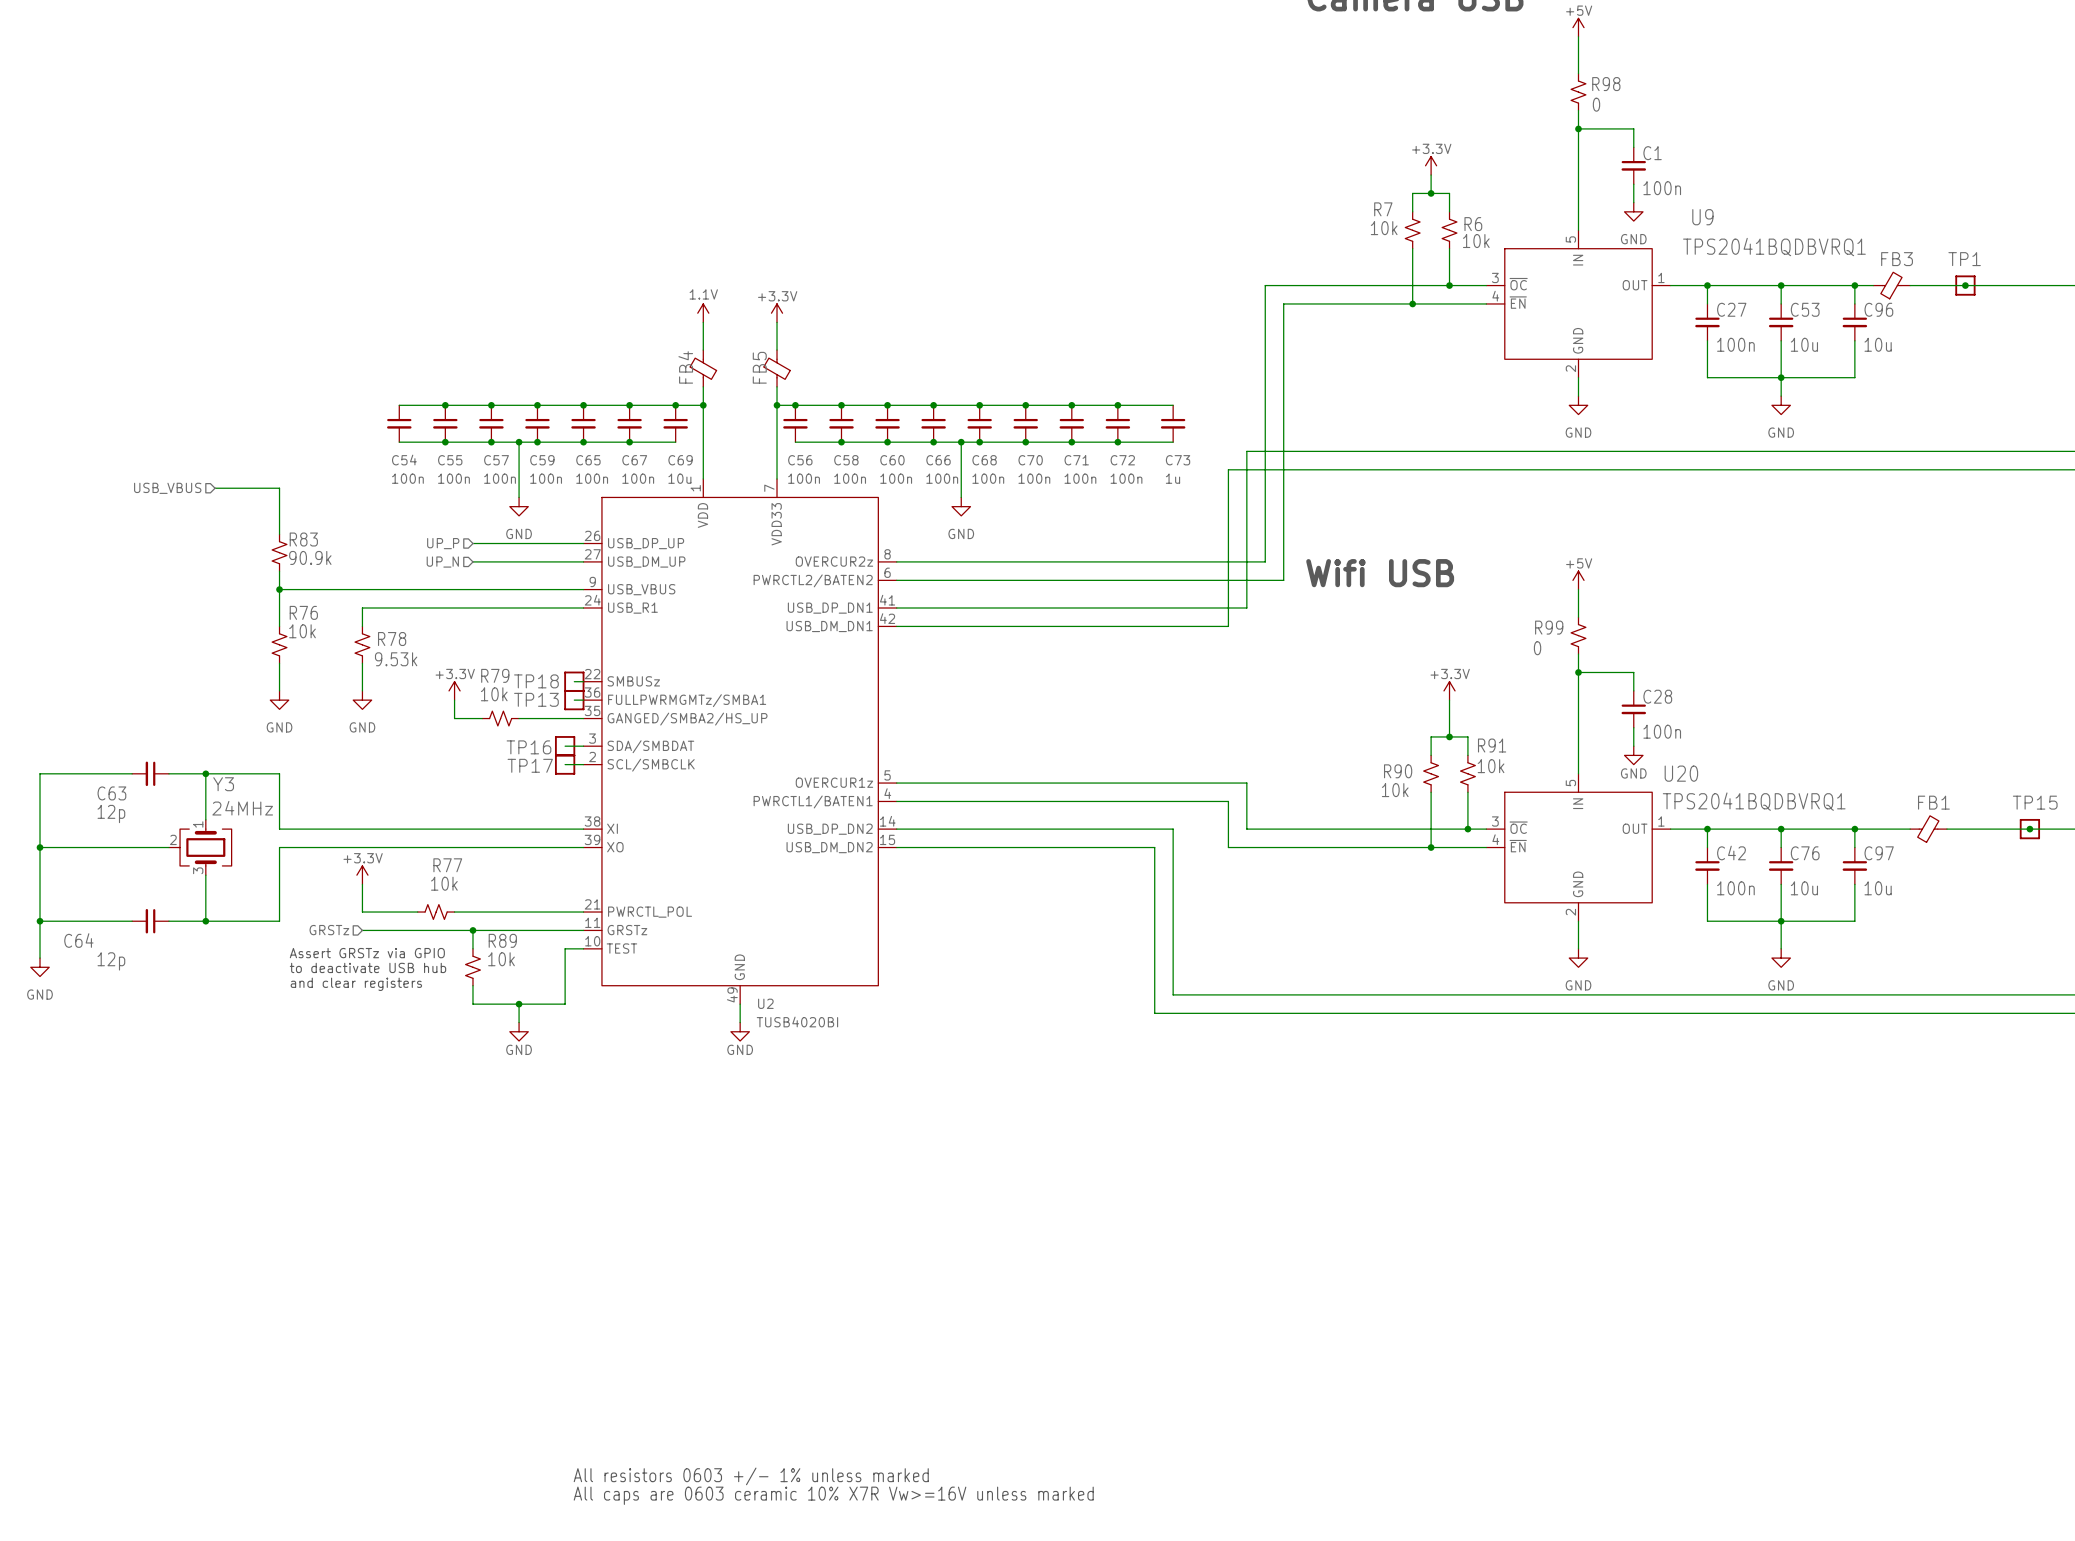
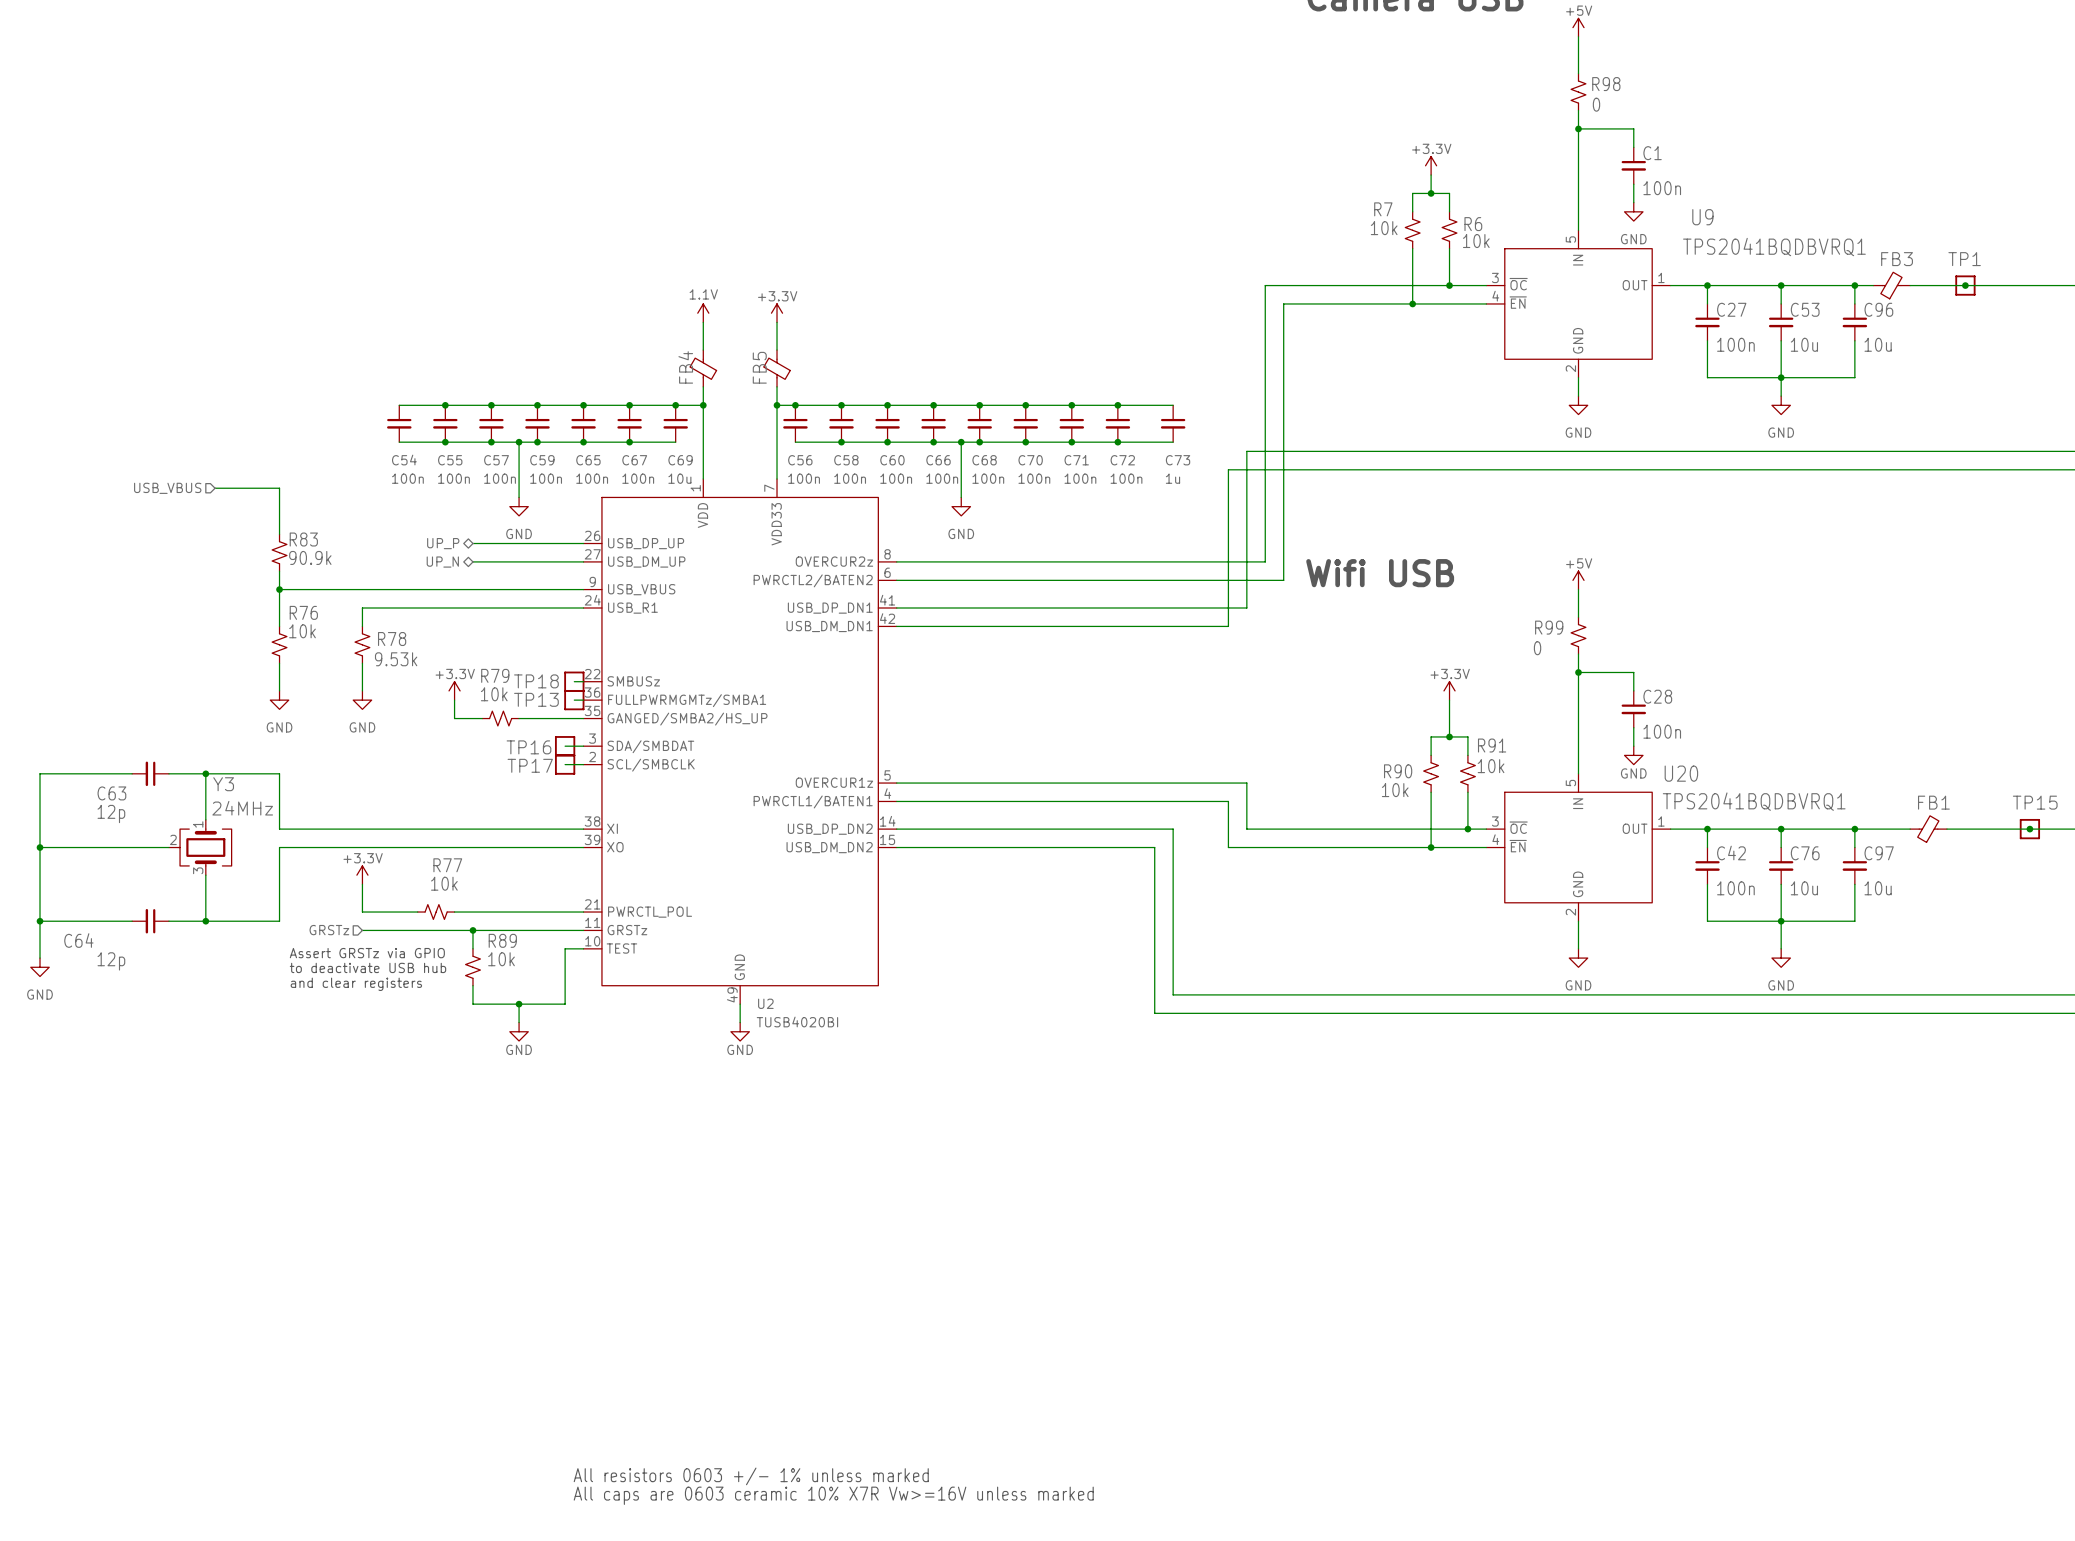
hierarchical label shape: input (443, 543) -> bidirectional (443, 543)
hierarchical label shape: input (442, 562) -> bidirectional (442, 562)

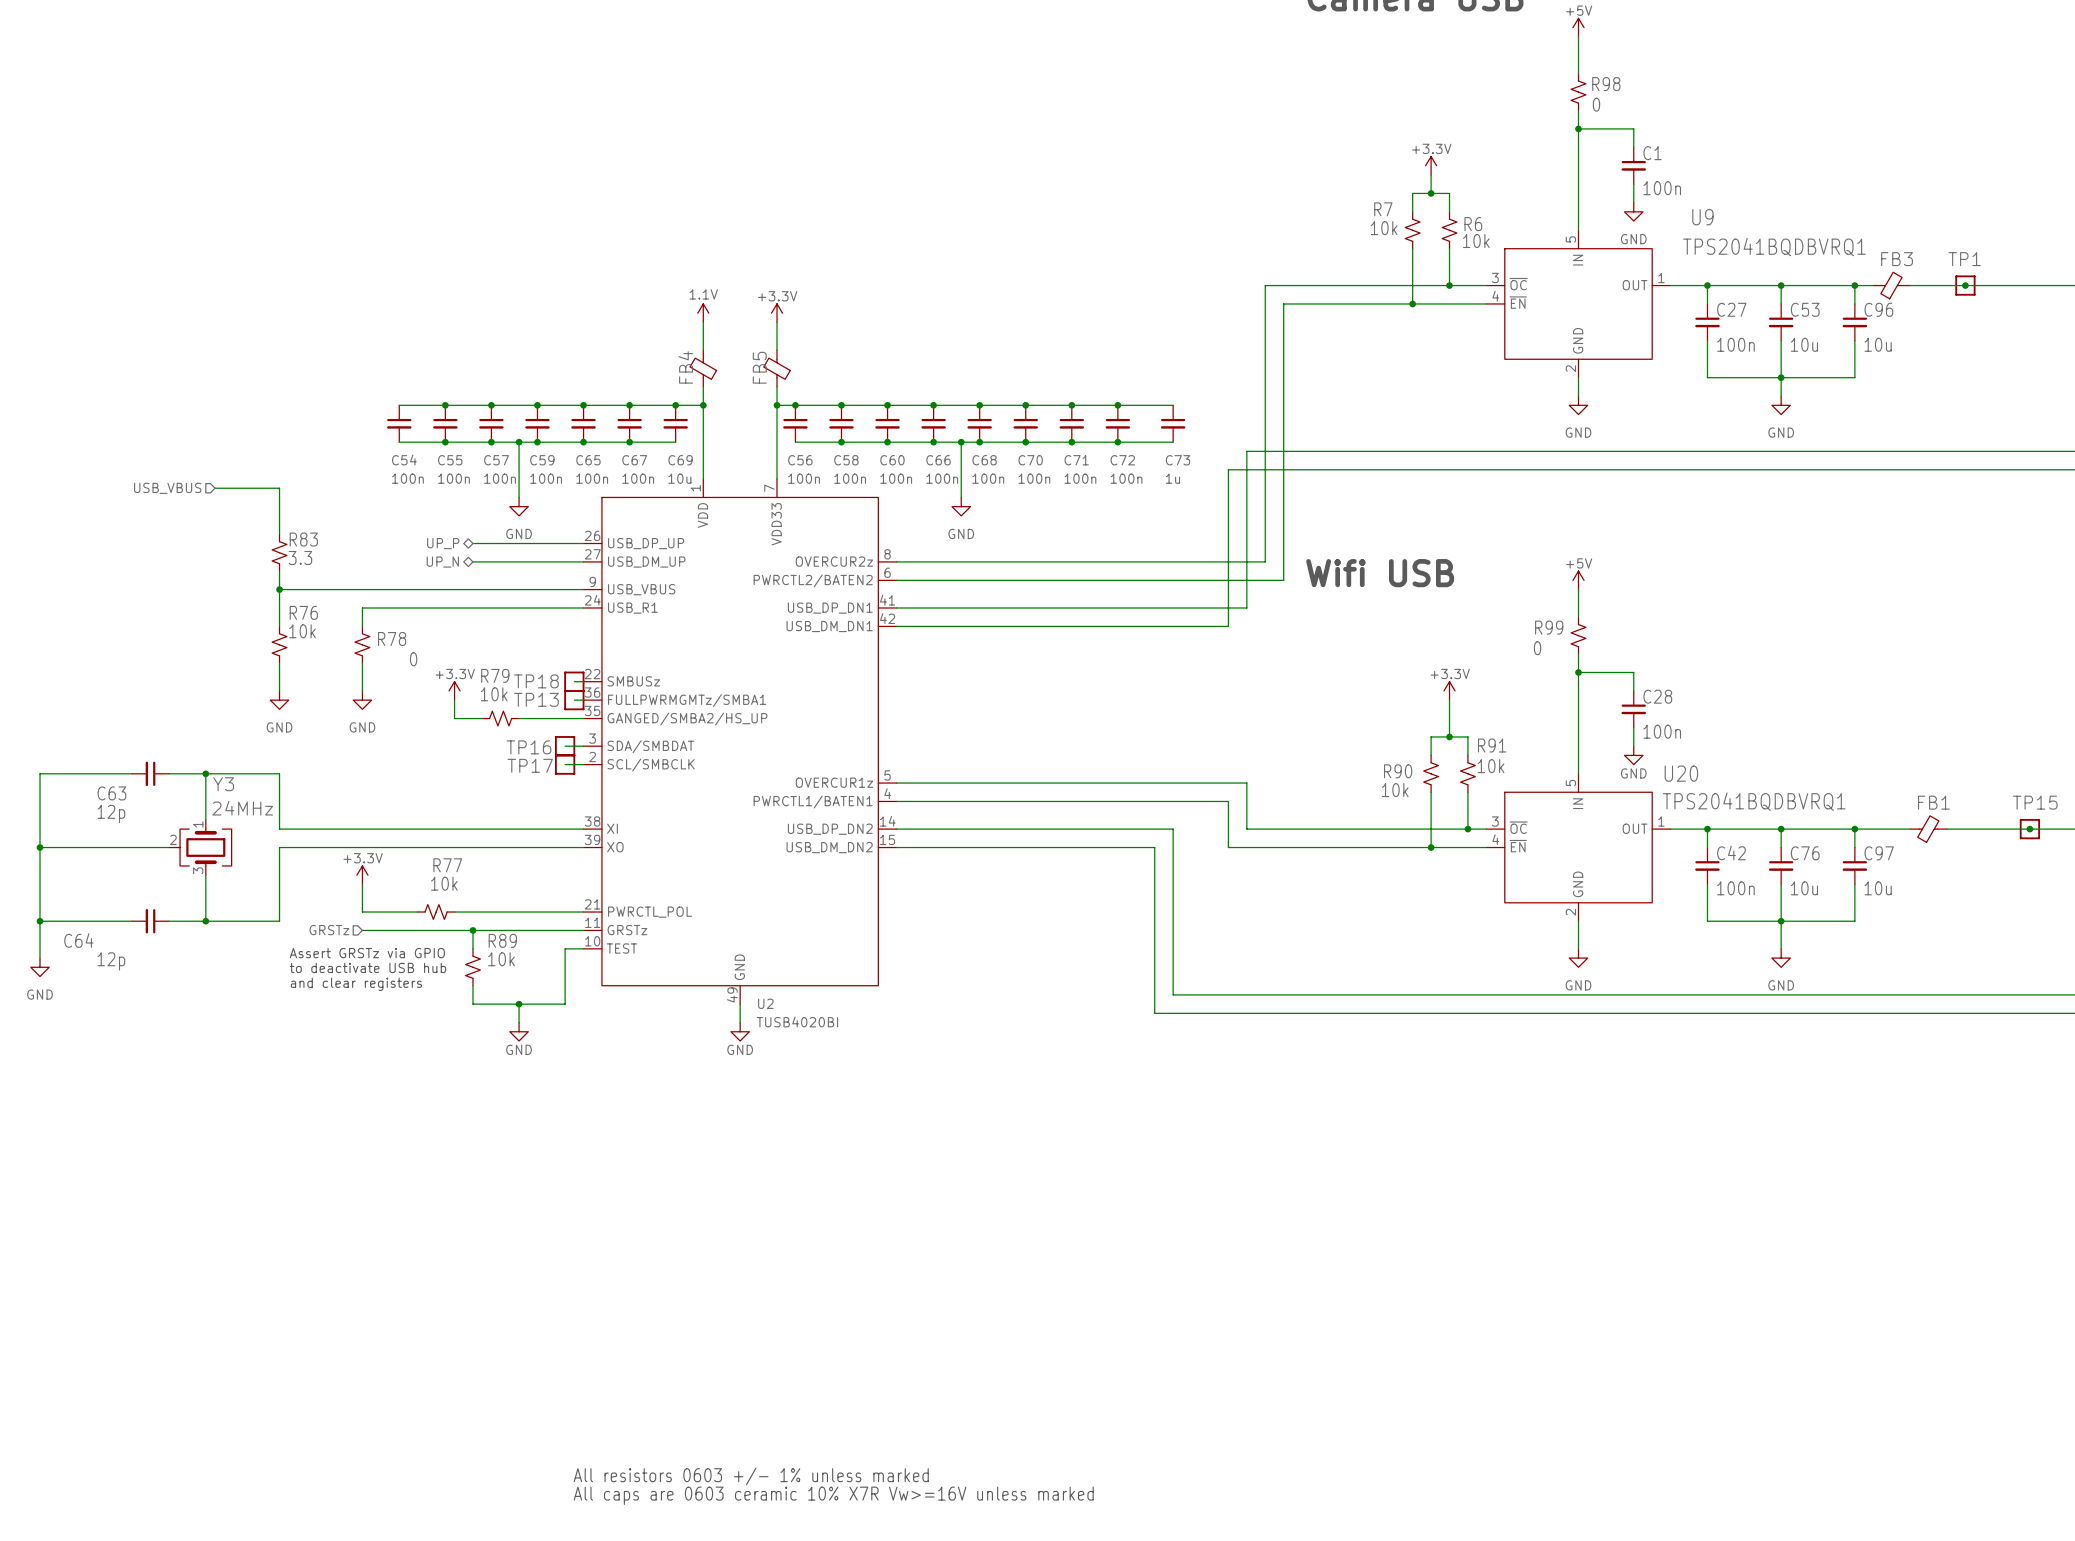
R83 value: 90.9k (310, 557) -> 3.3 (300, 557)
R78 value: 9.53k (396, 659) -> 0 (413, 659)

